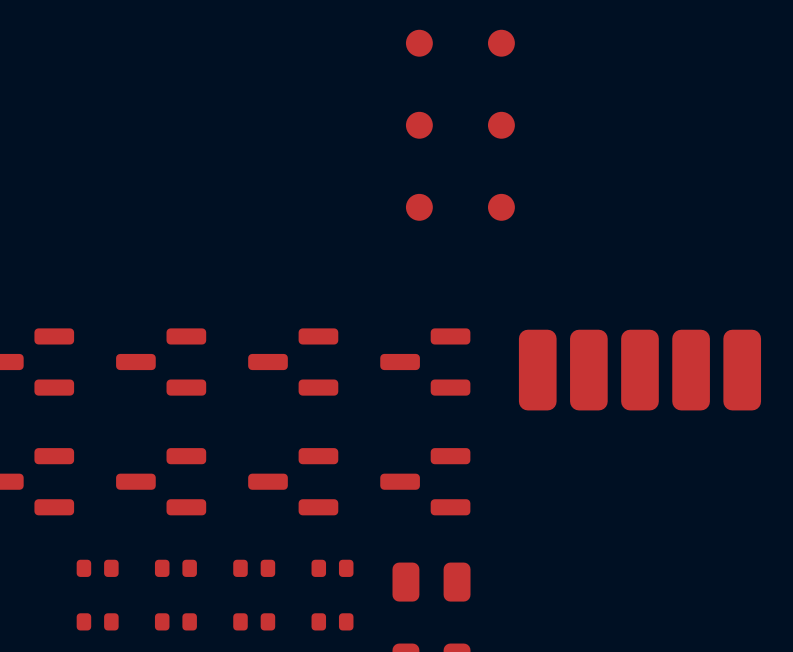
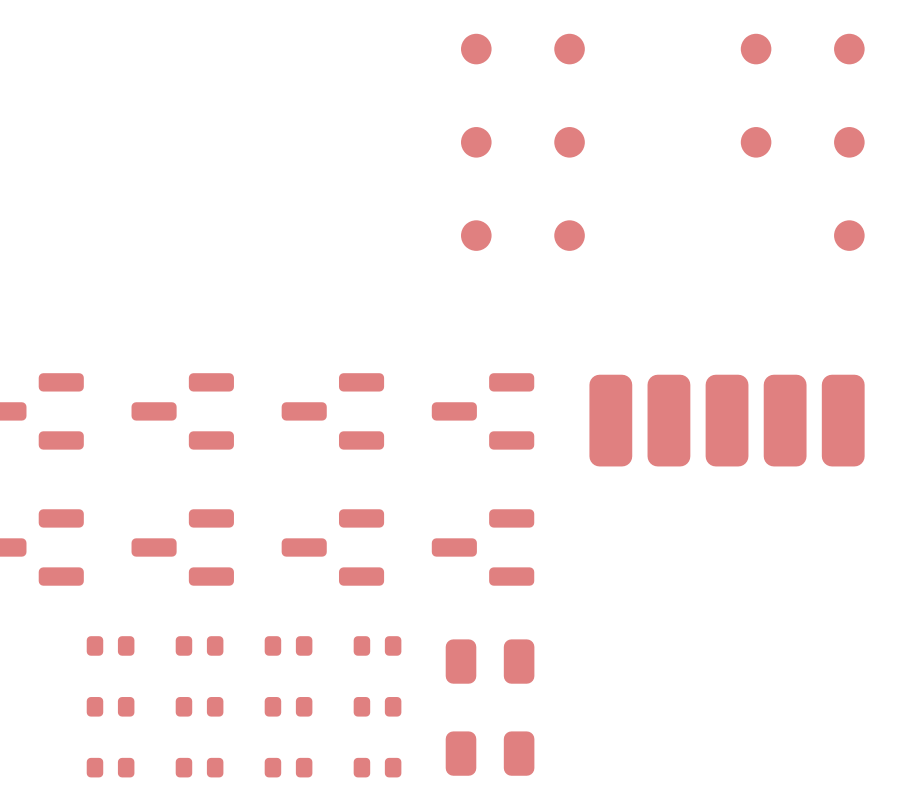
part: none -> (756, 49)
part: none -> (849, 49)
part: none -> (756, 142)
part: none -> (849, 142)
part: none -> (849, 235)

